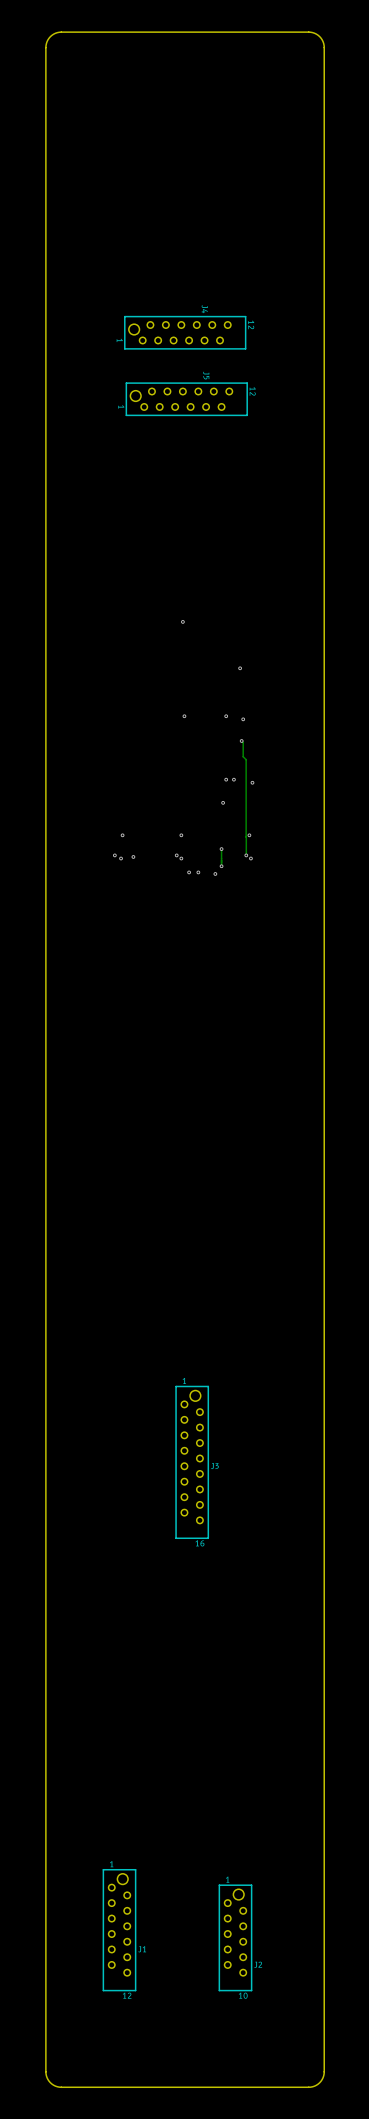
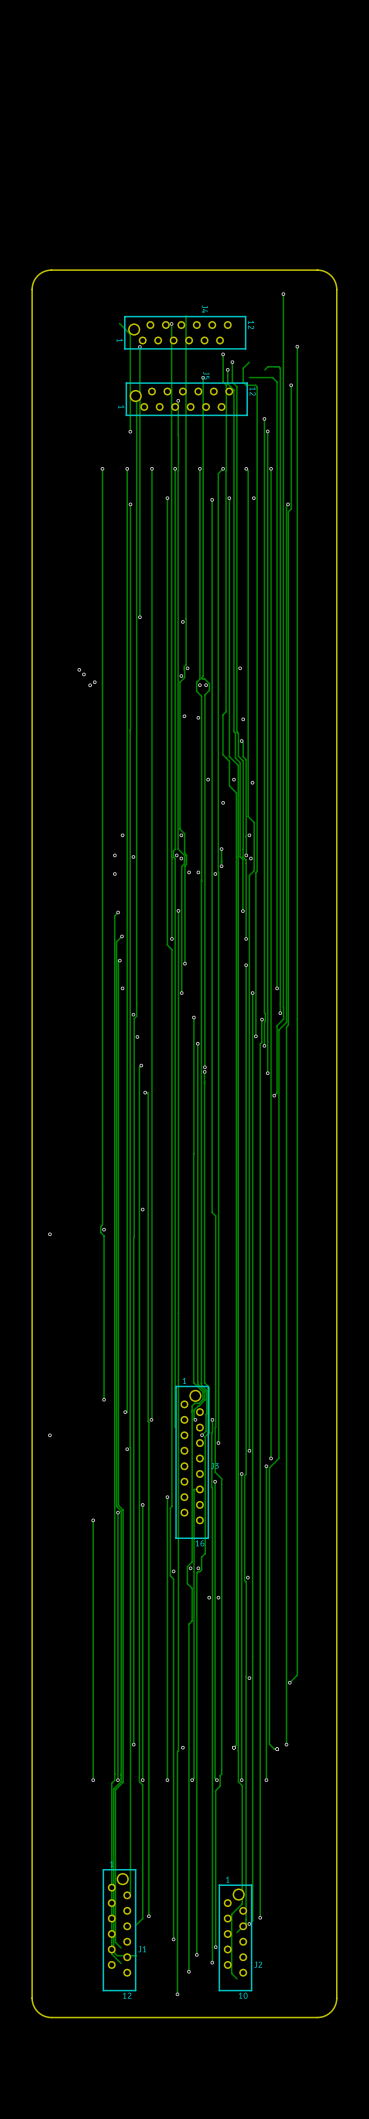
board edge: (308, 32) (61, 32) (50, 36) (46, 45) (45, 2071) (50, 2082) (59, 2087) (308, 2087) (318, 2084) (324, 2073) (324, 47) (319, 36) (308, 32) -> (51, 270) (37, 275) (32, 289) (32, 2000) (37, 2011) (51, 2017) (319, 2017) (332, 2009) (336, 1998) (336, 286) (329, 274) (317, 270) (51, 270)
track: none -> (283, 294) (283, 1019) (277, 1025) (277, 1092) (274, 1095)
via: none -> (283, 294)
track: none -> (185, 315) (186, 664) (184, 666) (184, 677) (179, 682) (179, 829) (184, 833) (184, 852) (186, 854) (184, 963)
track: none -> (119, 323) (130, 334) (130, 431)
track: none -> (171, 323) (171, 938)
via: none -> (171, 323)
track: none -> (139, 346) (139, 617)
via: none -> (139, 346)
track: none -> (297, 346) (297, 1675) (289, 1682)
via: none -> (297, 346)
track: none -> (223, 354) (223, 381) (226, 385) (226, 470) (226, 711) (222, 714) (222, 754) (229, 761) (229, 785) (236, 792) (236, 1745) (233, 1747)
via: none -> (223, 354)
track: none -> (232, 362) (232, 382) (236, 386) (236, 731) (238, 756) (243, 761) (243, 856) (246, 860) (246, 938)
via: none -> (232, 362)
track: none -> (249, 362) (243, 368) (243, 382) (246, 385) (257, 386) (255, 1036)
track: none -> (227, 369) (227, 383) (233, 389) (233, 731) (235, 758) (240, 762) (240, 856) (242, 859) (242, 911)
via: none -> (227, 369)
track: none -> (264, 369) (267, 366) (280, 368) (280, 1013)
track: none -> (203, 377) (201, 677) (209, 683) (209, 690) (204, 694) (204, 1067)
via: none -> (203, 377)
track: none -> (249, 377) (272, 377) (277, 382) (277, 988)
track: none -> (291, 385) (291, 508) (288, 511) (288, 1025) (286, 1027) (286, 1744)
via: none -> (291, 385)
track: none -> (136, 393) (133, 1744)
track: none -> (178, 400) (178, 849) (184, 855) (184, 863) (181, 866) (181, 993)
via: none -> (178, 400)
track: none -> (264, 418) (264, 1045)
via: none -> (264, 418)
track: none -> (267, 430) (267, 1073)
via: none -> (130, 431)
via: none -> (267, 431)
track: none -> (102, 468) (102, 1225) (100, 1232) (104, 1235) (104, 1399)
via: none -> (102, 468)
track: none -> (127, 468) (127, 1412) (125, 1412)
via: none -> (127, 468)
track: none -> (151, 468) (151, 1419)
via: none -> (151, 468)
track: none -> (175, 468) (175, 849) (173, 850) (175, 858) (175, 1427)
via: none -> (175, 468)
track: none -> (199, 468) (199, 679) (196, 682) (196, 691) (201, 696) (201, 881)
via: none -> (199, 468)
track: none -> (223, 468) (218, 473) (218, 1443)
via: none -> (223, 468)
track: none -> (246, 468) (248, 470) (248, 816) (254, 822) (254, 870) (249, 875) (249, 1450)
via: none -> (246, 468)
track: none -> (271, 468) (271, 1458)
via: none -> (271, 468)
track: none -> (167, 498) (167, 945) (171, 949) (172, 1506) (170, 1508) (170, 1575) (173, 1579) (173, 1939)
via: none -> (167, 498)
track: none -> (229, 498) (229, 756) (238, 765) (238, 1750) (238, 1781) (242, 1785) (242, 1903) (231, 1914) (231, 1973) (237, 1978)
via: none -> (229, 498)
via: none -> (253, 498)
track: none -> (212, 499) (212, 1212) (215, 1216) (215, 1472) (221, 1478) (221, 1774) (220, 1786) (215, 1790) (215, 1947)
via: none -> (212, 499)
track: none -> (130, 504) (130, 1892)
via: none -> (130, 504)
track: none -> (288, 504) (286, 505) (286, 1022) (278, 1030) (278, 1458) (269, 1467) (269, 1744) (274, 1749) (277, 1749)
via: none -> (288, 504)
via: none -> (139, 617)
via: none -> (187, 668)
via: none -> (79, 669)
via: none -> (83, 674)
via: none -> (181, 676)
via: none -> (94, 682)
via: none -> (90, 685)
via: none -> (199, 685)
via: none -> (206, 685)
via: (226, 716) -> none
via: none -> (198, 717)
via position: (226, 779) -> (208, 779)
via position: (121, 858) -> (114, 873)
track: none -> (201, 879) (201, 1385) (206, 1390) (206, 1431) (202, 1435)
track: none -> (178, 910) (178, 1313)
via: none -> (178, 910)
via: none -> (242, 911)
track: none -> (118, 912) (114, 915) (114, 1773) (114, 1780) (111, 1783) (111, 1954) (121, 1963)
via: none -> (118, 912)
track: none -> (121, 936) (116, 941) (116, 1506) (121, 1511) (121, 1781) (113, 1789) (113, 1952) (117, 1955) (136, 1955)
via: none -> (121, 936)
via: none -> (171, 938)
via: none -> (246, 938)
track: none -> (119, 960) (118, 1505) (123, 1510) (123, 1782) (115, 1789) (115, 1942) (121, 1947)
via: none -> (119, 960)
via: none -> (184, 963)
track: none -> (246, 965) (246, 1474) (244, 1475) (246, 1923) (237, 1932)
via: none -> (246, 965)
via: none -> (122, 988)
via: none -> (277, 988)
via: none -> (181, 993)
track: none -> (252, 993) (251, 1922)
via: none -> (252, 993)
via: none -> (280, 1013)
via: none -> (133, 1014)
track: none -> (193, 1017) (193, 1382) (203, 1392) (203, 1399) (192, 1405) (192, 1561) (187, 1566) (187, 1583) (192, 1588) (192, 1620) (188, 1624) (188, 1971)
via: none -> (193, 1017)
track: none -> (261, 1019) (260, 1044) (260, 1917)
via: none -> (261, 1019)
via: none -> (137, 1036)
via: none -> (255, 1036)
track: none -> (197, 1043) (197, 1384) (204, 1391) (204, 1400) (194, 1410) (195, 1419)
via: none -> (197, 1043)
via: none -> (264, 1045)
track: none -> (141, 1065) (139, 1067) (139, 1781) (142, 1784) (142, 1918) (136, 1924)
via: none -> (141, 1065)
via: none -> (204, 1067)
track: none -> (204, 1071) (204, 1382) (209, 1387) (209, 1432) (205, 1436) (205, 1553)
via: none -> (204, 1071)
via: none -> (267, 1073)
track: none -> (145, 1092) (148, 1093) (148, 1916)
via: none -> (145, 1092)
via: none -> (274, 1095)
via: none -> (142, 1209)
via: none -> (104, 1229)
via: none -> (49, 1234)
track: none -> (178, 1313) (177, 1994)
via: none -> (104, 1399)
via: none -> (125, 1412)
via: none -> (151, 1419)
via: none -> (195, 1419)
track: none -> (212, 1419) (212, 1962)
via: none -> (212, 1419)
via: none -> (49, 1435)
via: none -> (202, 1435)
via: none -> (218, 1443)
via: none -> (127, 1449)
via: none -> (249, 1450)
via: none -> (271, 1458)
track: none -> (266, 1466) (266, 1780)
via: none -> (266, 1466)
track: none -> (241, 1473) (241, 1780)
via: none -> (241, 1473)
track: none -> (215, 1481) (215, 1778) (216, 1780)
via: none -> (215, 1481)
track: none -> (199, 1489) (194, 1489) (194, 1778) (192, 1780)
track: none -> (167, 1497) (167, 1780)
via: none -> (167, 1497)
track: none -> (142, 1504) (142, 1780)
via: none -> (142, 1504)
track: none -> (117, 1512) (117, 1780)
via: none -> (117, 1512)
track: none -> (93, 1520) (93, 1780)
via: none -> (93, 1520)
track: none -> (205, 1553) (201, 1557) (201, 1569) (196, 1572) (196, 1954)
via: none -> (190, 1568)
via: none -> (198, 1568)
via: none -> (173, 1571)
via: none -> (247, 1577)
via: none -> (209, 1597)
via: none -> (218, 1597)
via: none -> (249, 1678)
via: none -> (289, 1682)
via: none -> (133, 1744)
via: none -> (286, 1744)
via: none -> (182, 1747)
via: none -> (233, 1747)
via: none -> (277, 1749)
via: none -> (93, 1780)
via: none -> (117, 1780)
via: none -> (142, 1780)
via: none -> (167, 1780)
via: none -> (192, 1780)
via: none -> (216, 1780)
via: none -> (241, 1780)
via: none -> (266, 1780)
via: none -> (148, 1916)
via: none -> (260, 1917)
via: none -> (249, 1923)
via: none -> (173, 1939)
via: none -> (215, 1947)
via: none -> (196, 1954)
via: none -> (212, 1962)
via: none -> (188, 1971)
via: none -> (177, 1994)

